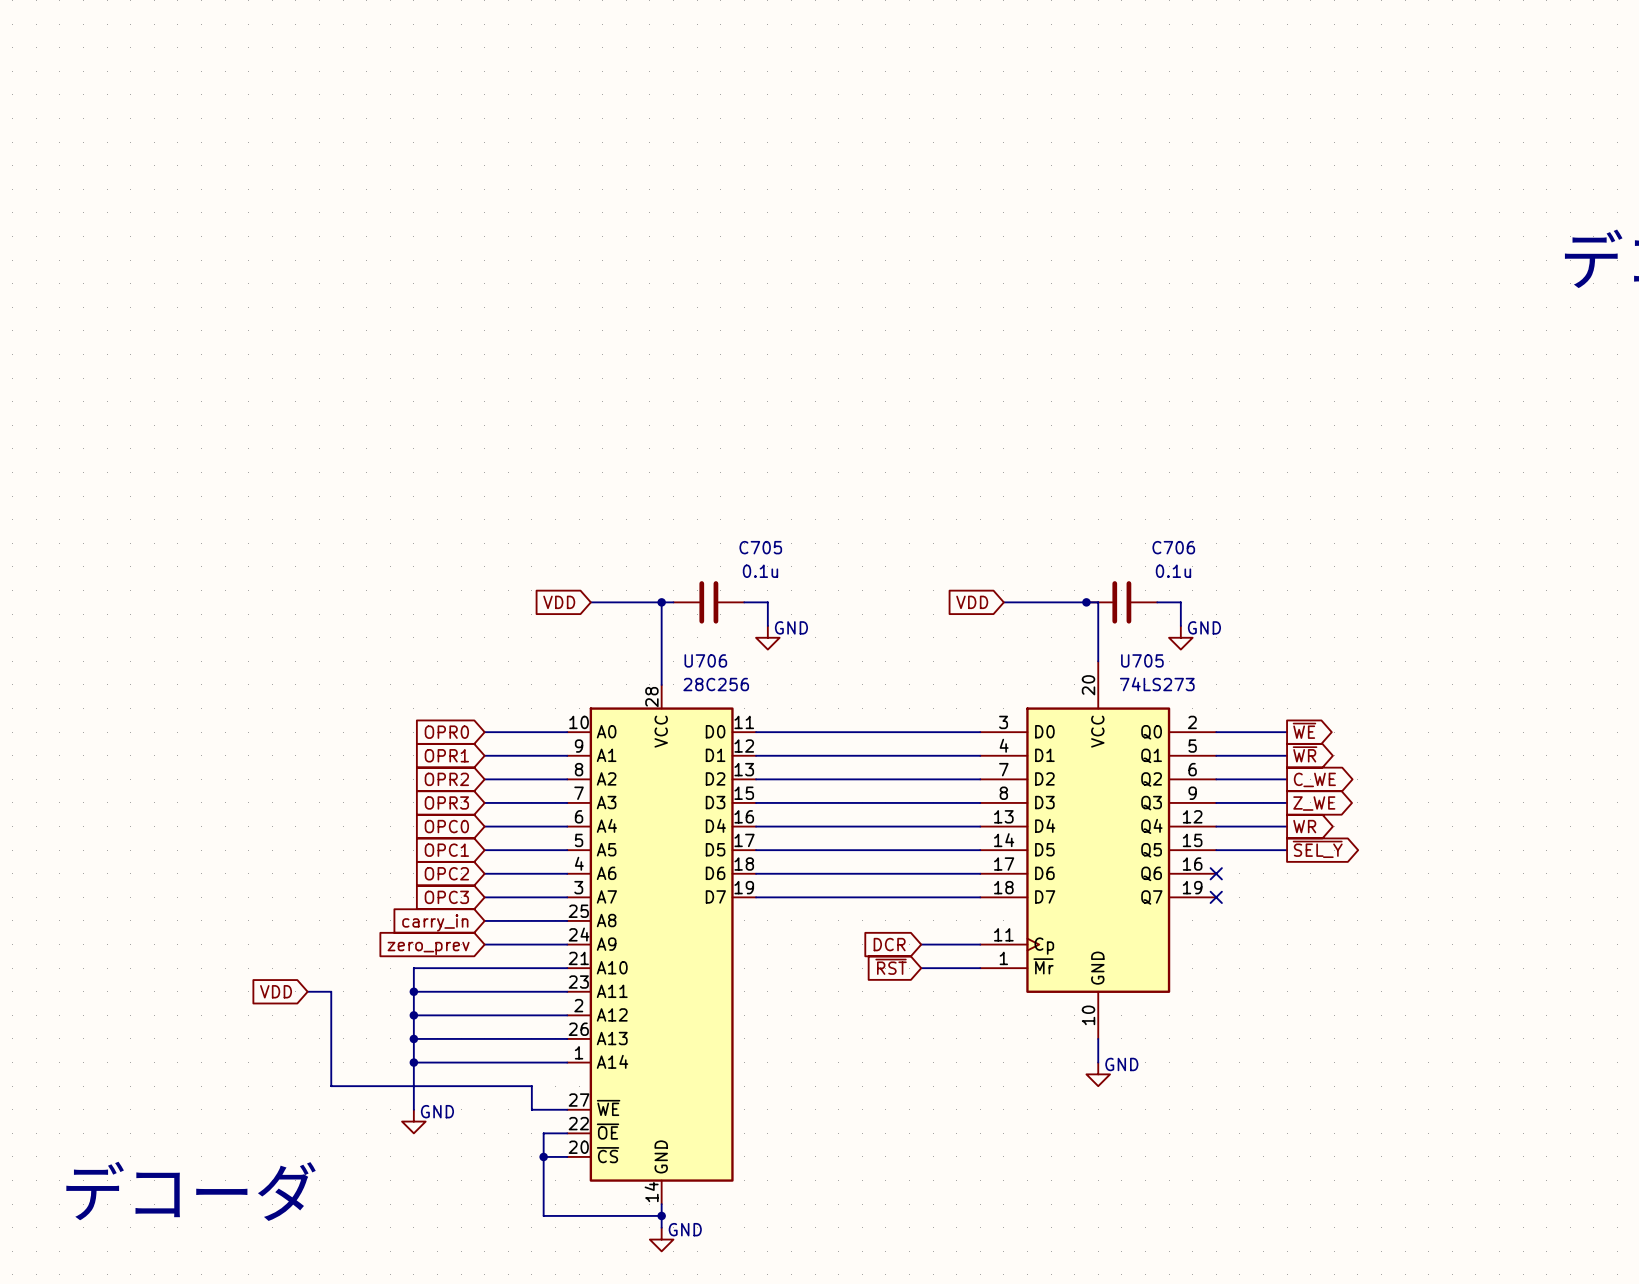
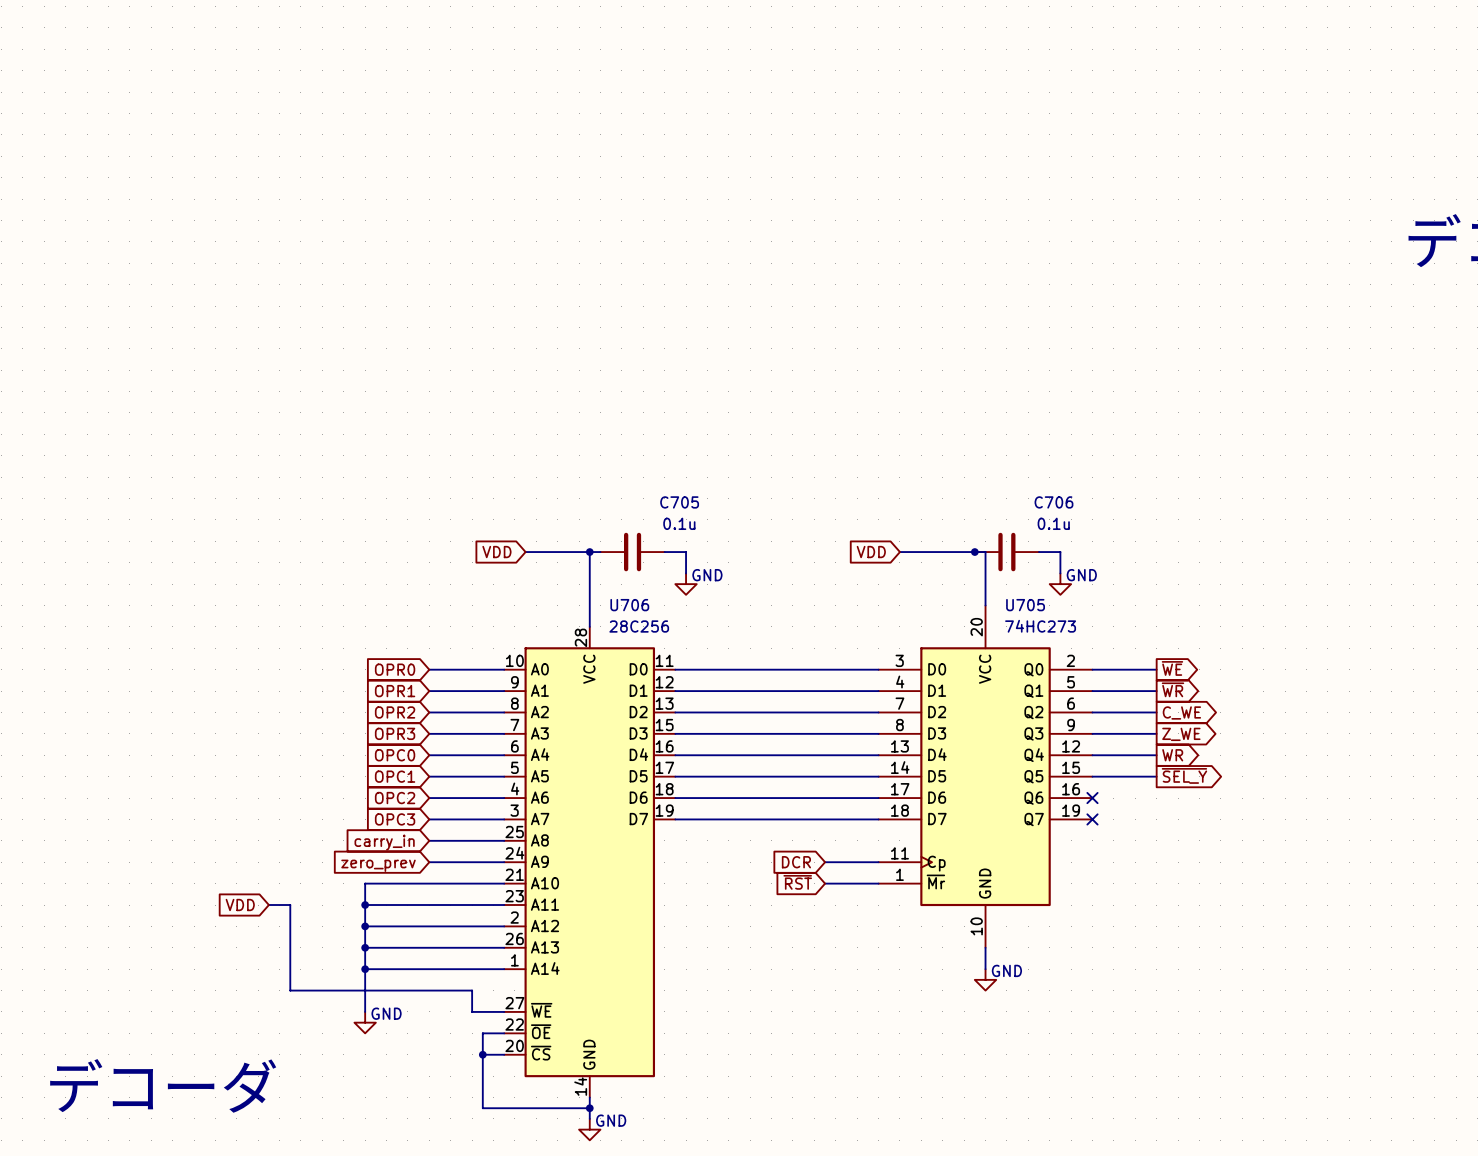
U705 value: 74LS273 (1157, 684) -> 74HC273 (1040, 626)

